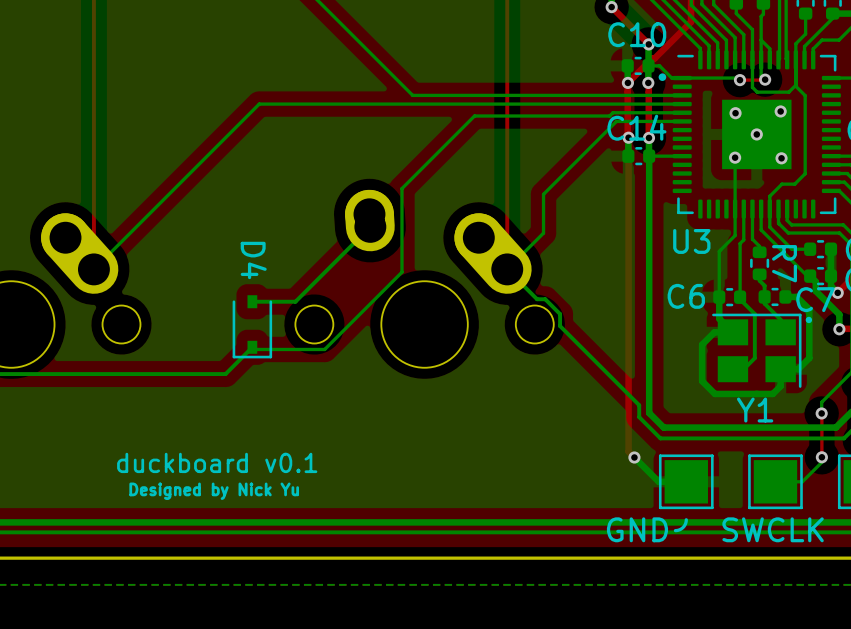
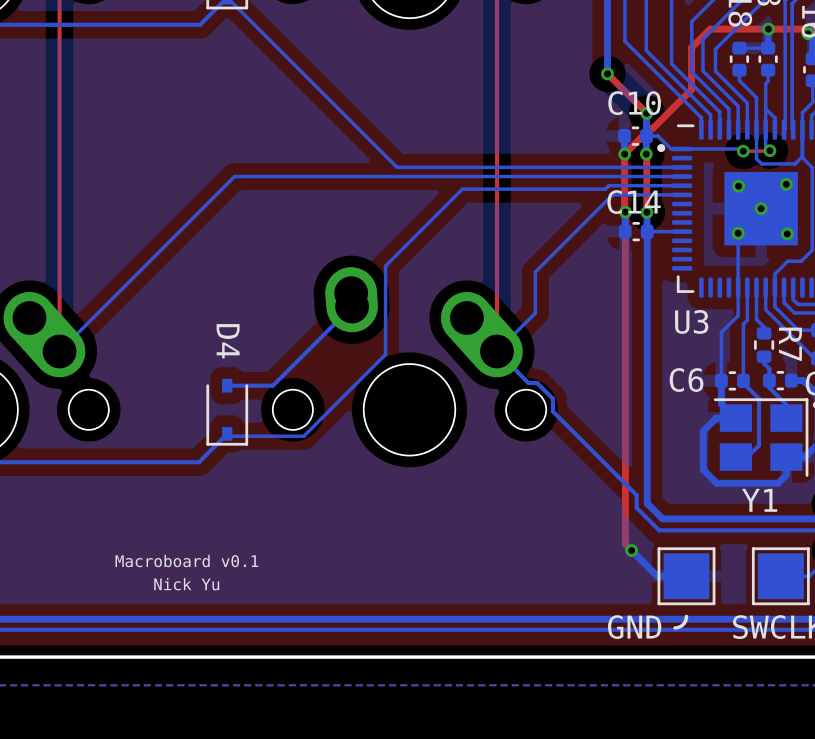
text: duckboard v0.1 (217, 462) -> Macroboard v0.1 (186, 561)
text: Designed by Nick Yu (214, 491) -> Nick Yu (186, 584)

